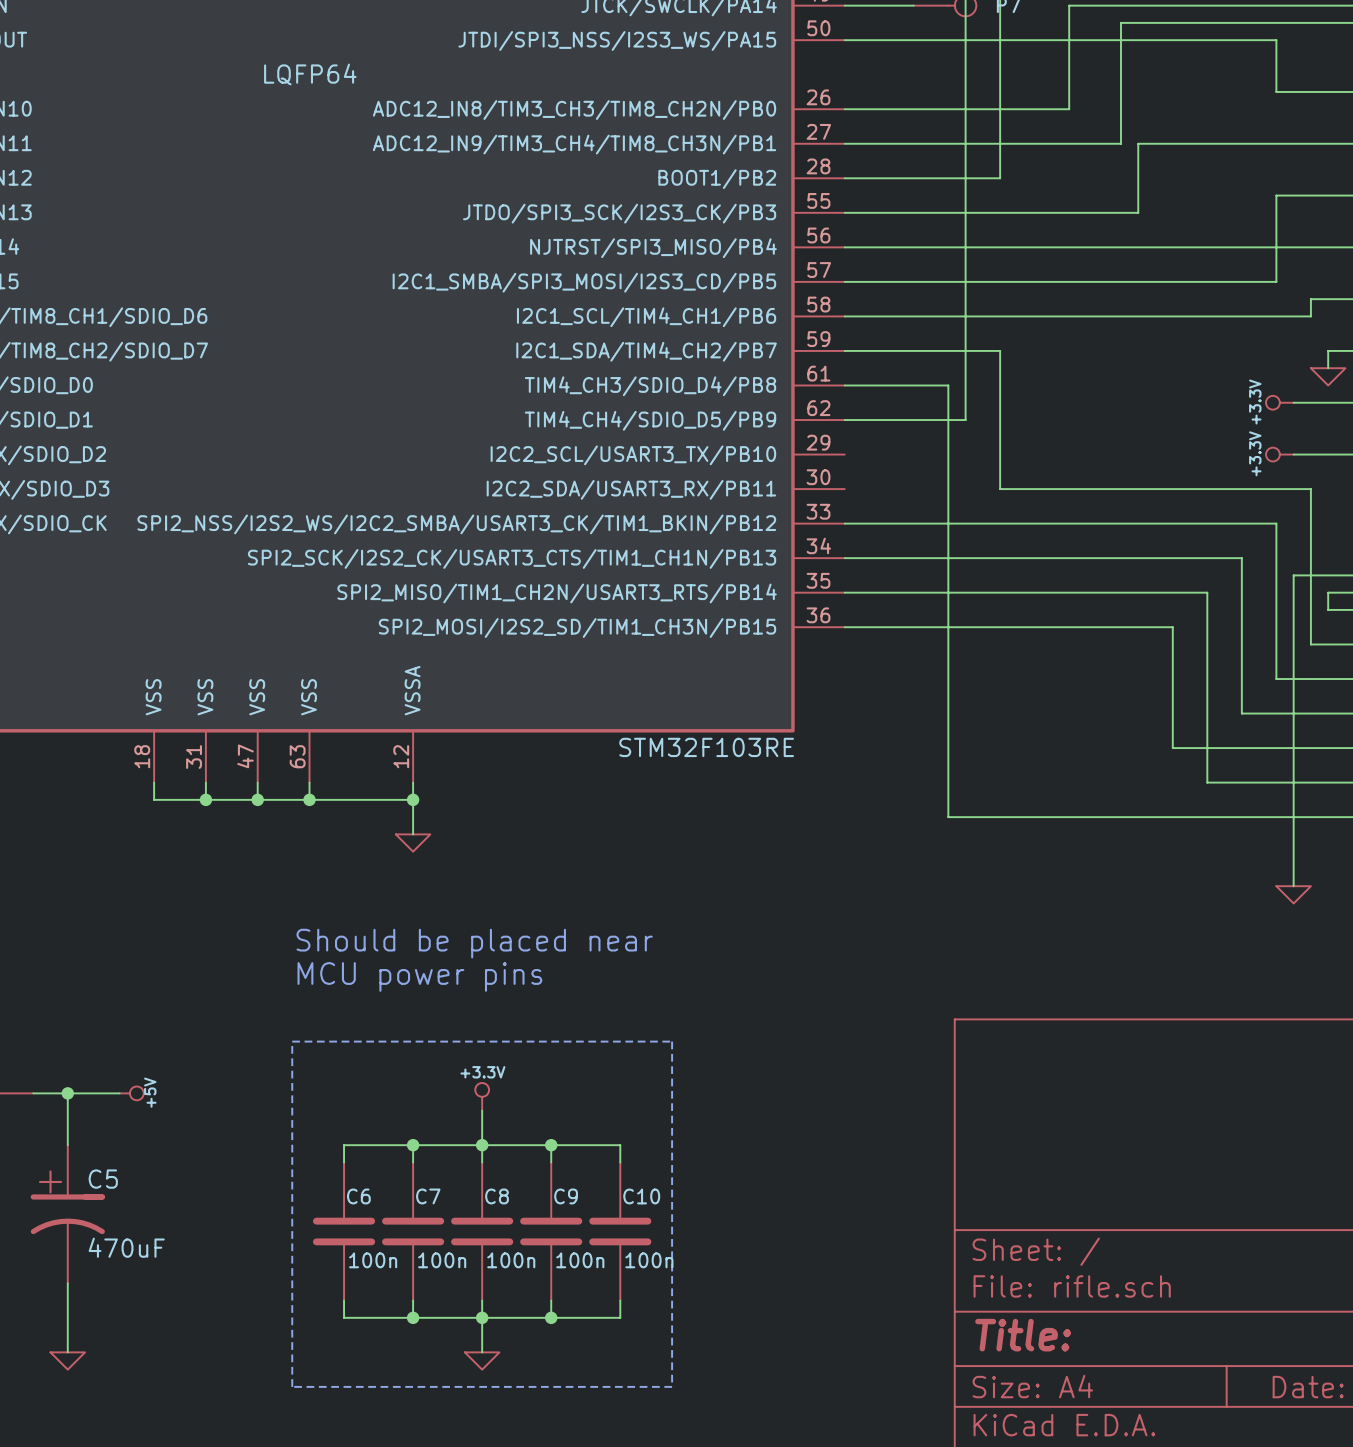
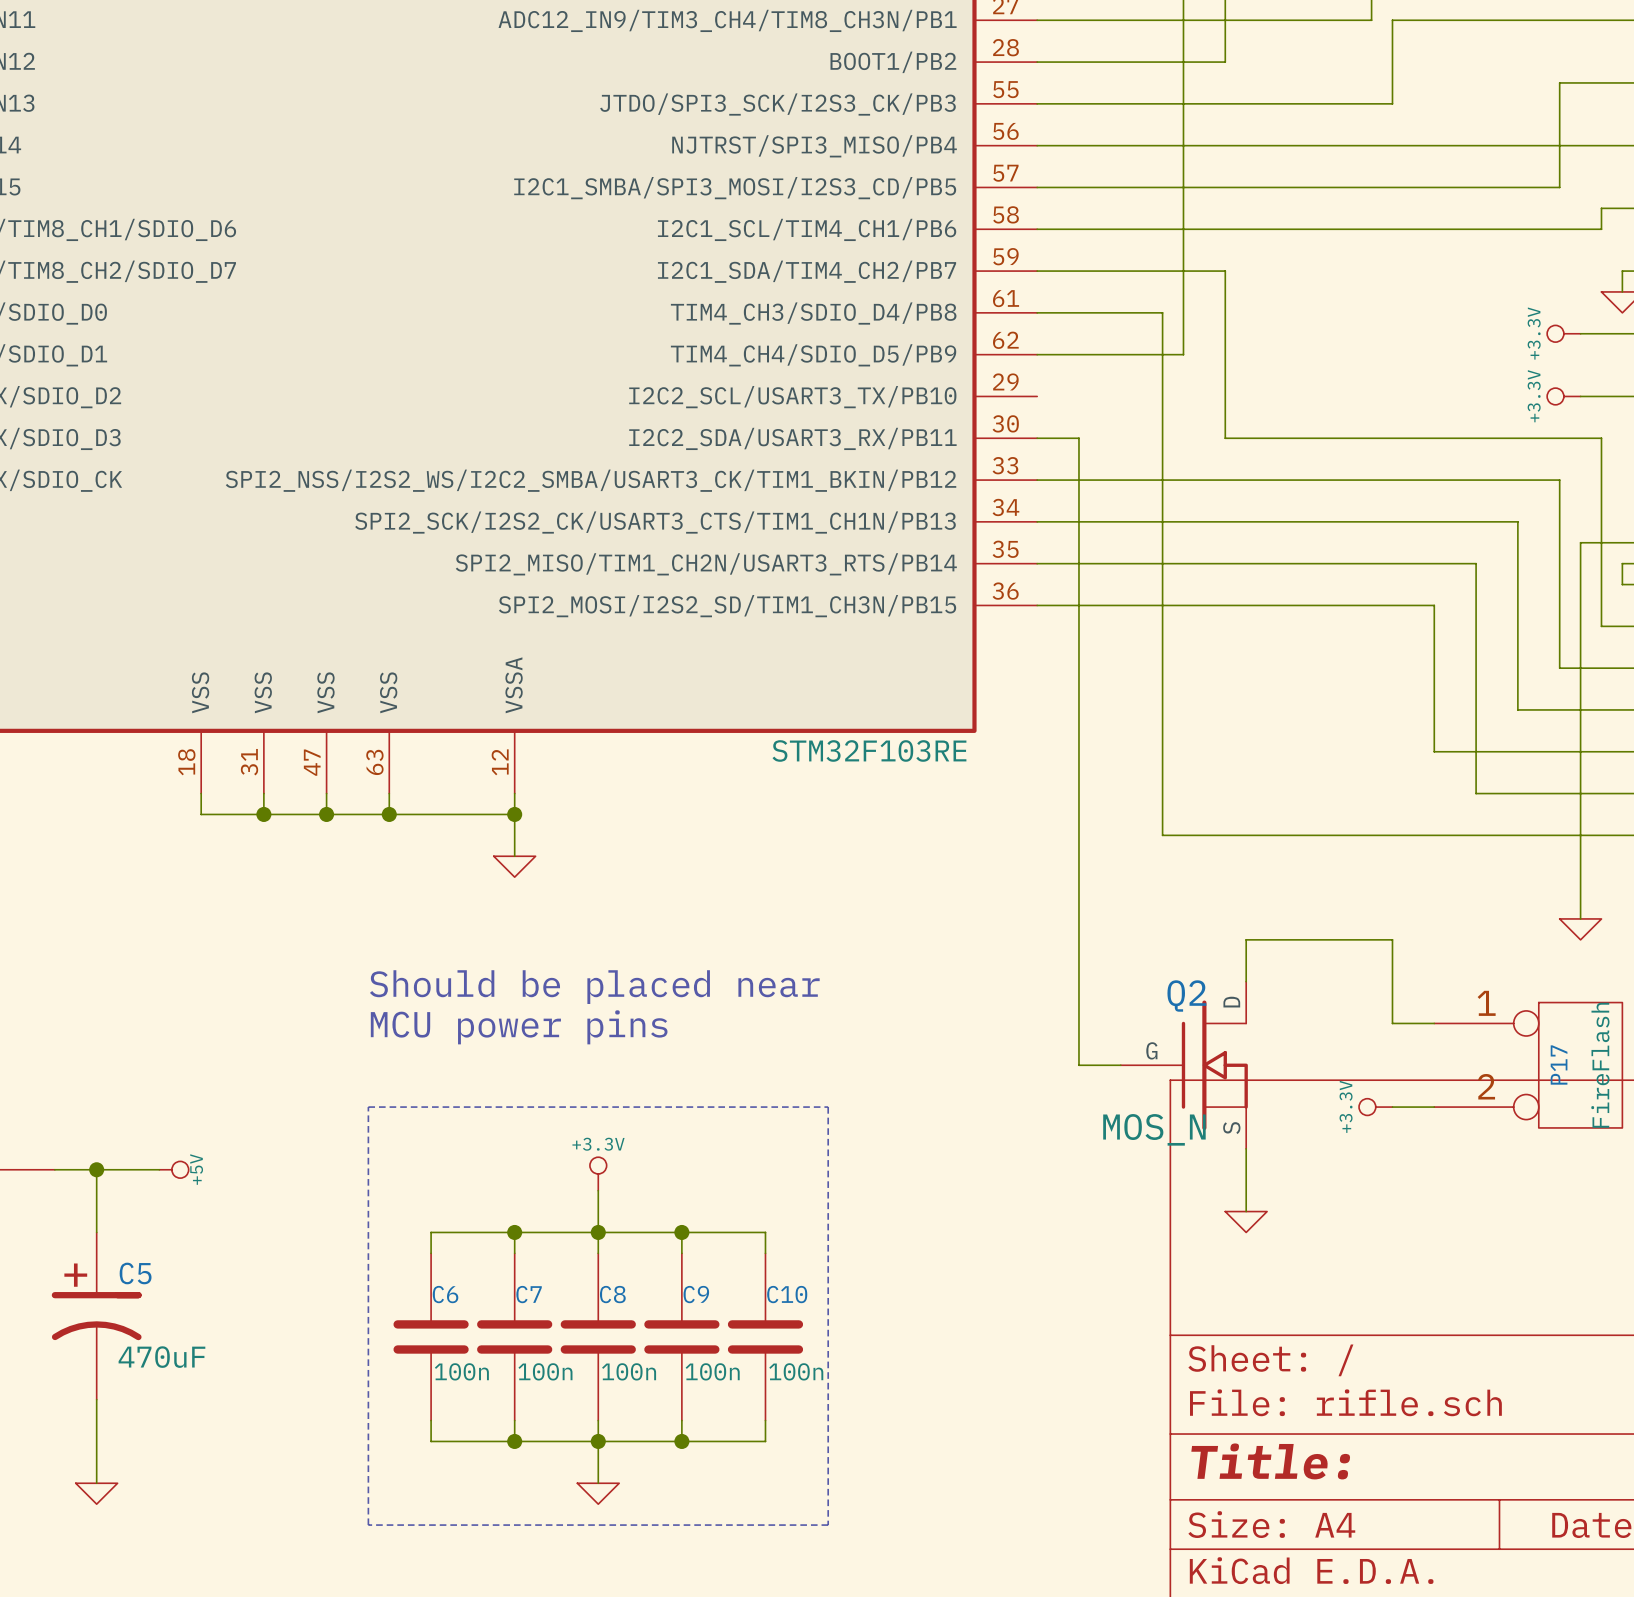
wire: none -> (1037, 438) (1078, 438) (1078, 1065) (1120, 1065)
wire: none -> (1246, 981) (1246, 939) (1392, 939) (1392, 1023) (1434, 1023)
Q2: none -> MOS_N (1184, 1065)
P17: none -> FireFlash (1528, 1065)
power symbol: none -> +3.3V (1375, 1107)
wire: none -> (1392, 1107) (1434, 1107)
wire: none -> (1246, 1148) (1246, 1211)
power symbol: none -> (1246, 1222)

